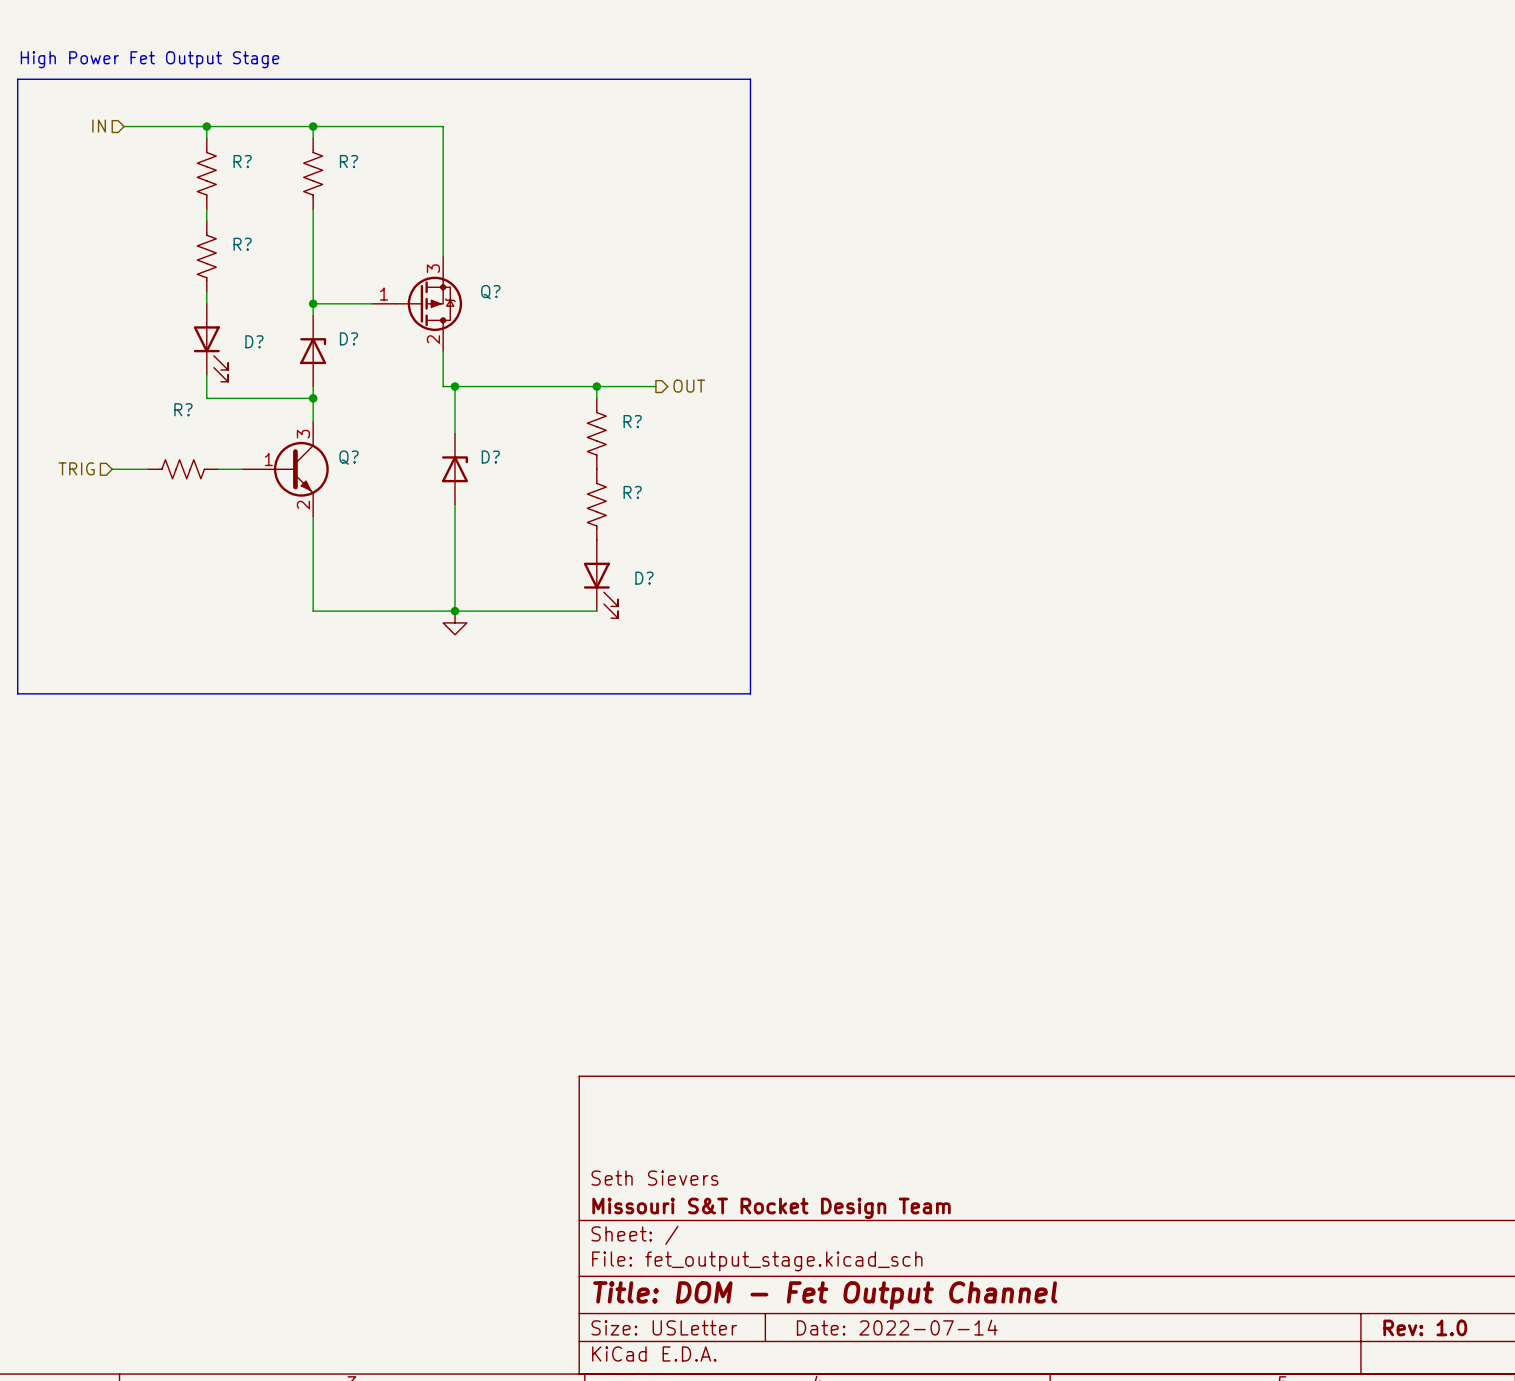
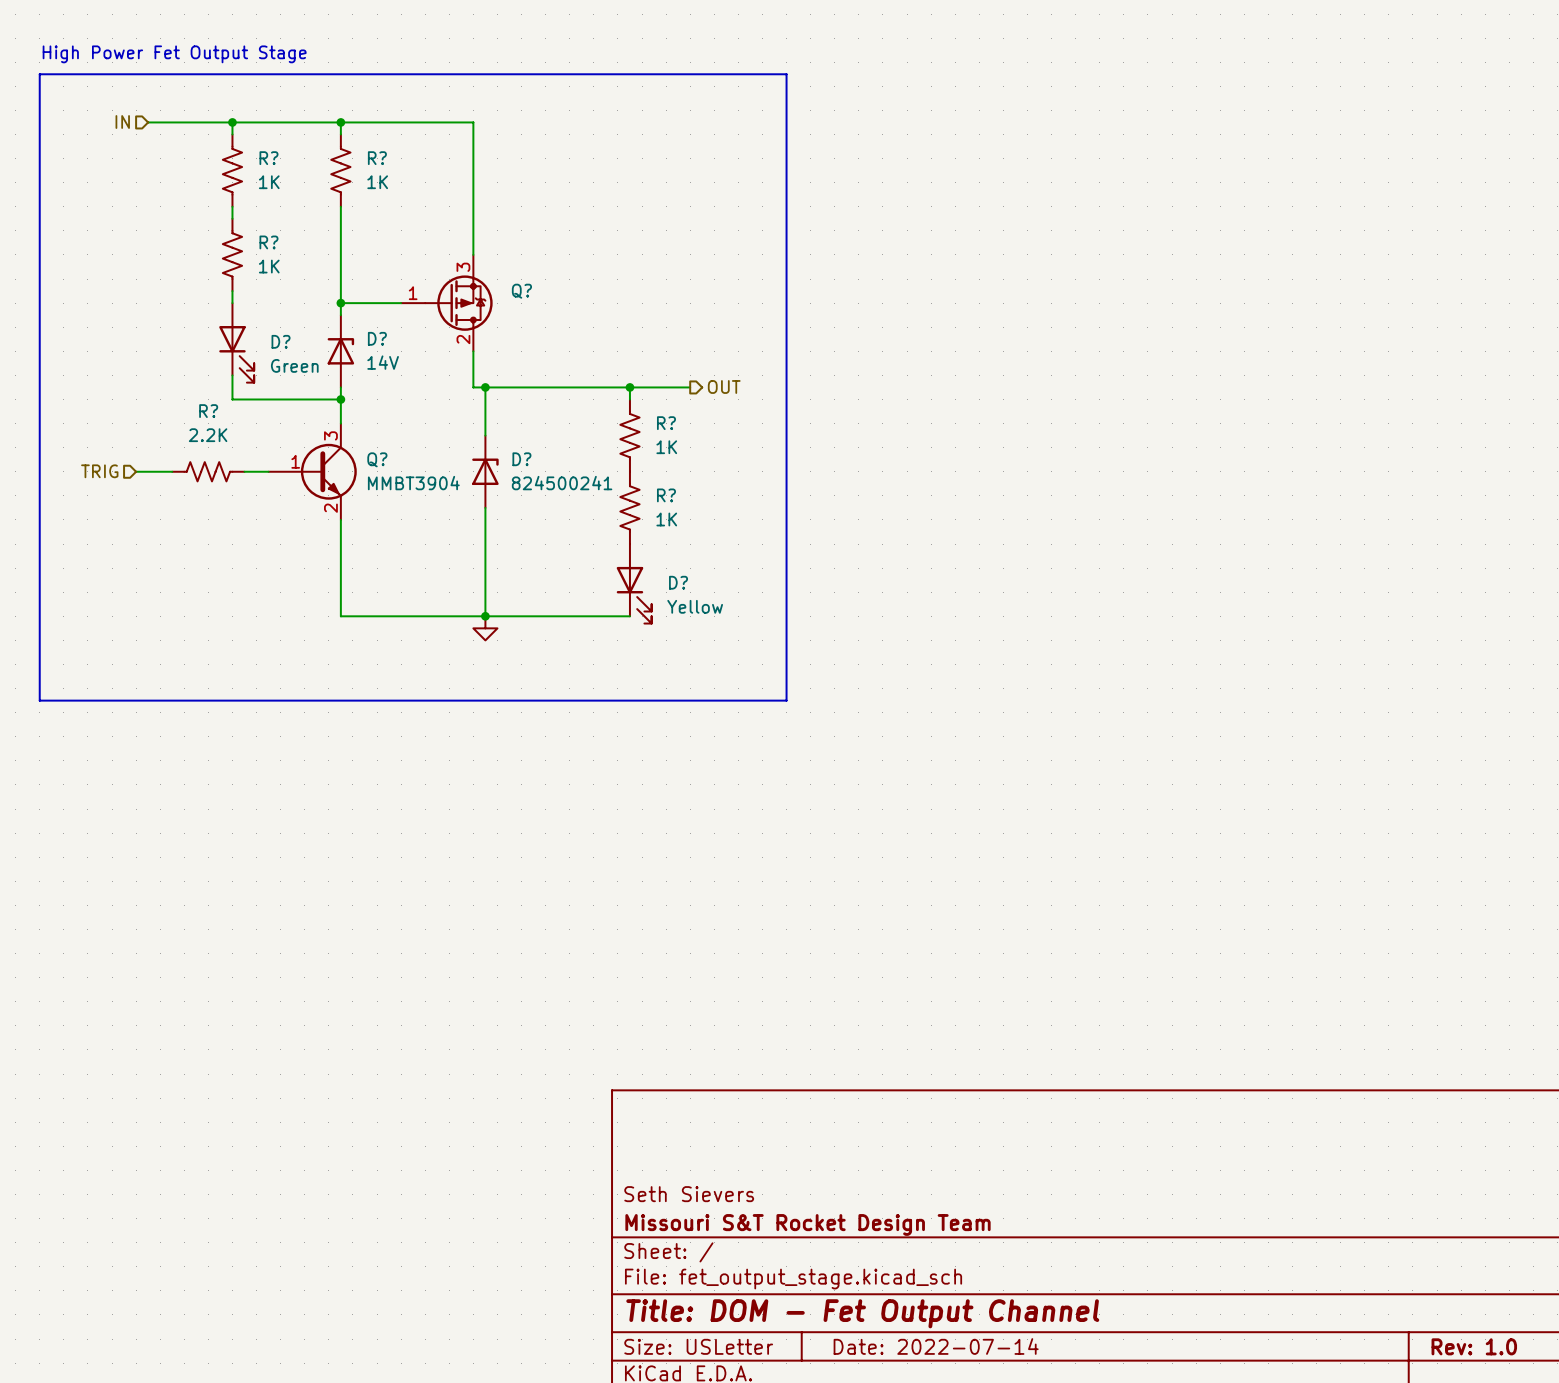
R? value: none -> 1K (269, 182)
R? value: none -> 1K (377, 182)
R? value: none -> 1K (269, 266)
D? value: none -> 14V (383, 362)
D? value: none -> Green (294, 365)
R? value: none -> 2.2K (208, 435)
R? value: none -> 1K (666, 447)
Q? value: none -> MMBT3904 (413, 483)
D? value: none -> 824500241 (562, 483)
R? value: none -> 1K (666, 519)
D? value: none -> Yellow (695, 606)

